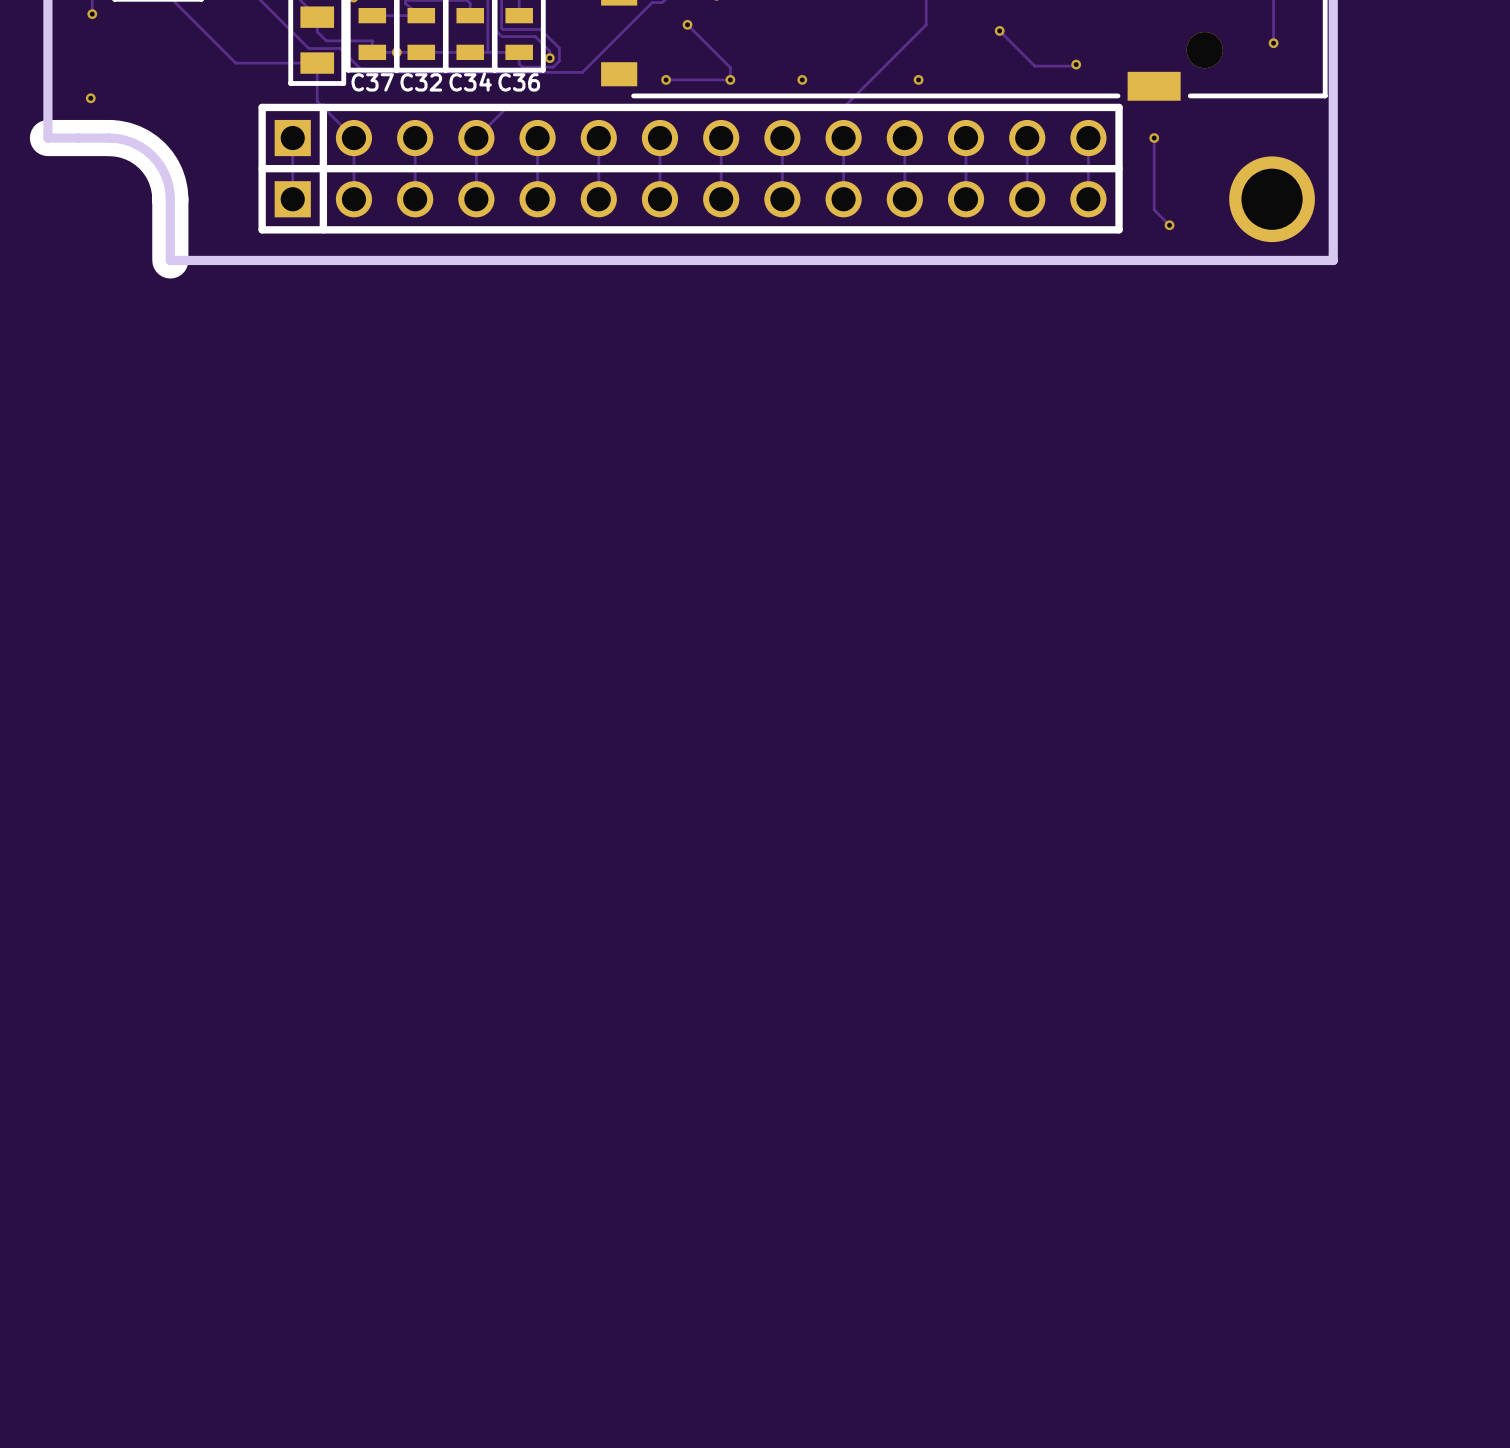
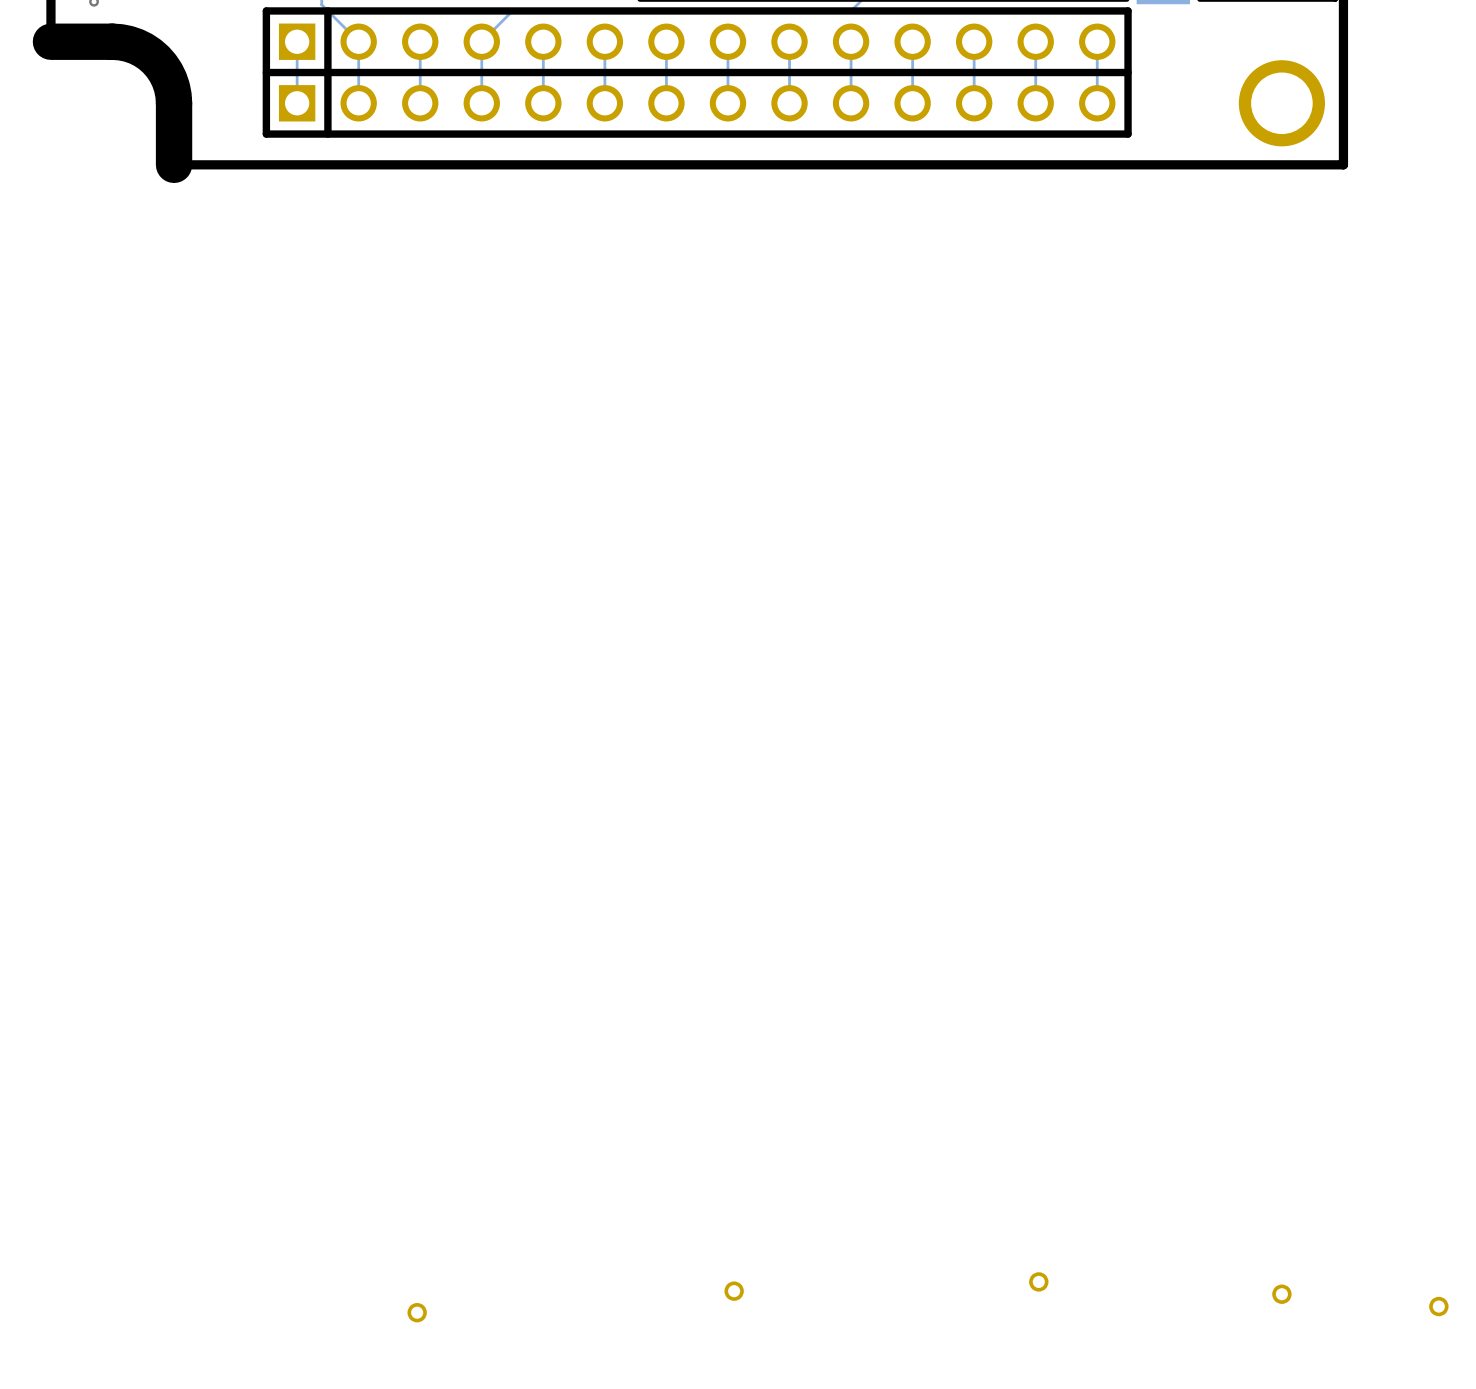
track: (1154, 138) (1154, 209) (1169, 225) -> none
via: (1154, 138) -> none
via: (1169, 225) -> none
part: none -> (1038, 1281)
part: none -> (734, 1291)
part: none -> (1281, 1294)
part: none -> (1438, 1306)
part: none -> (417, 1312)

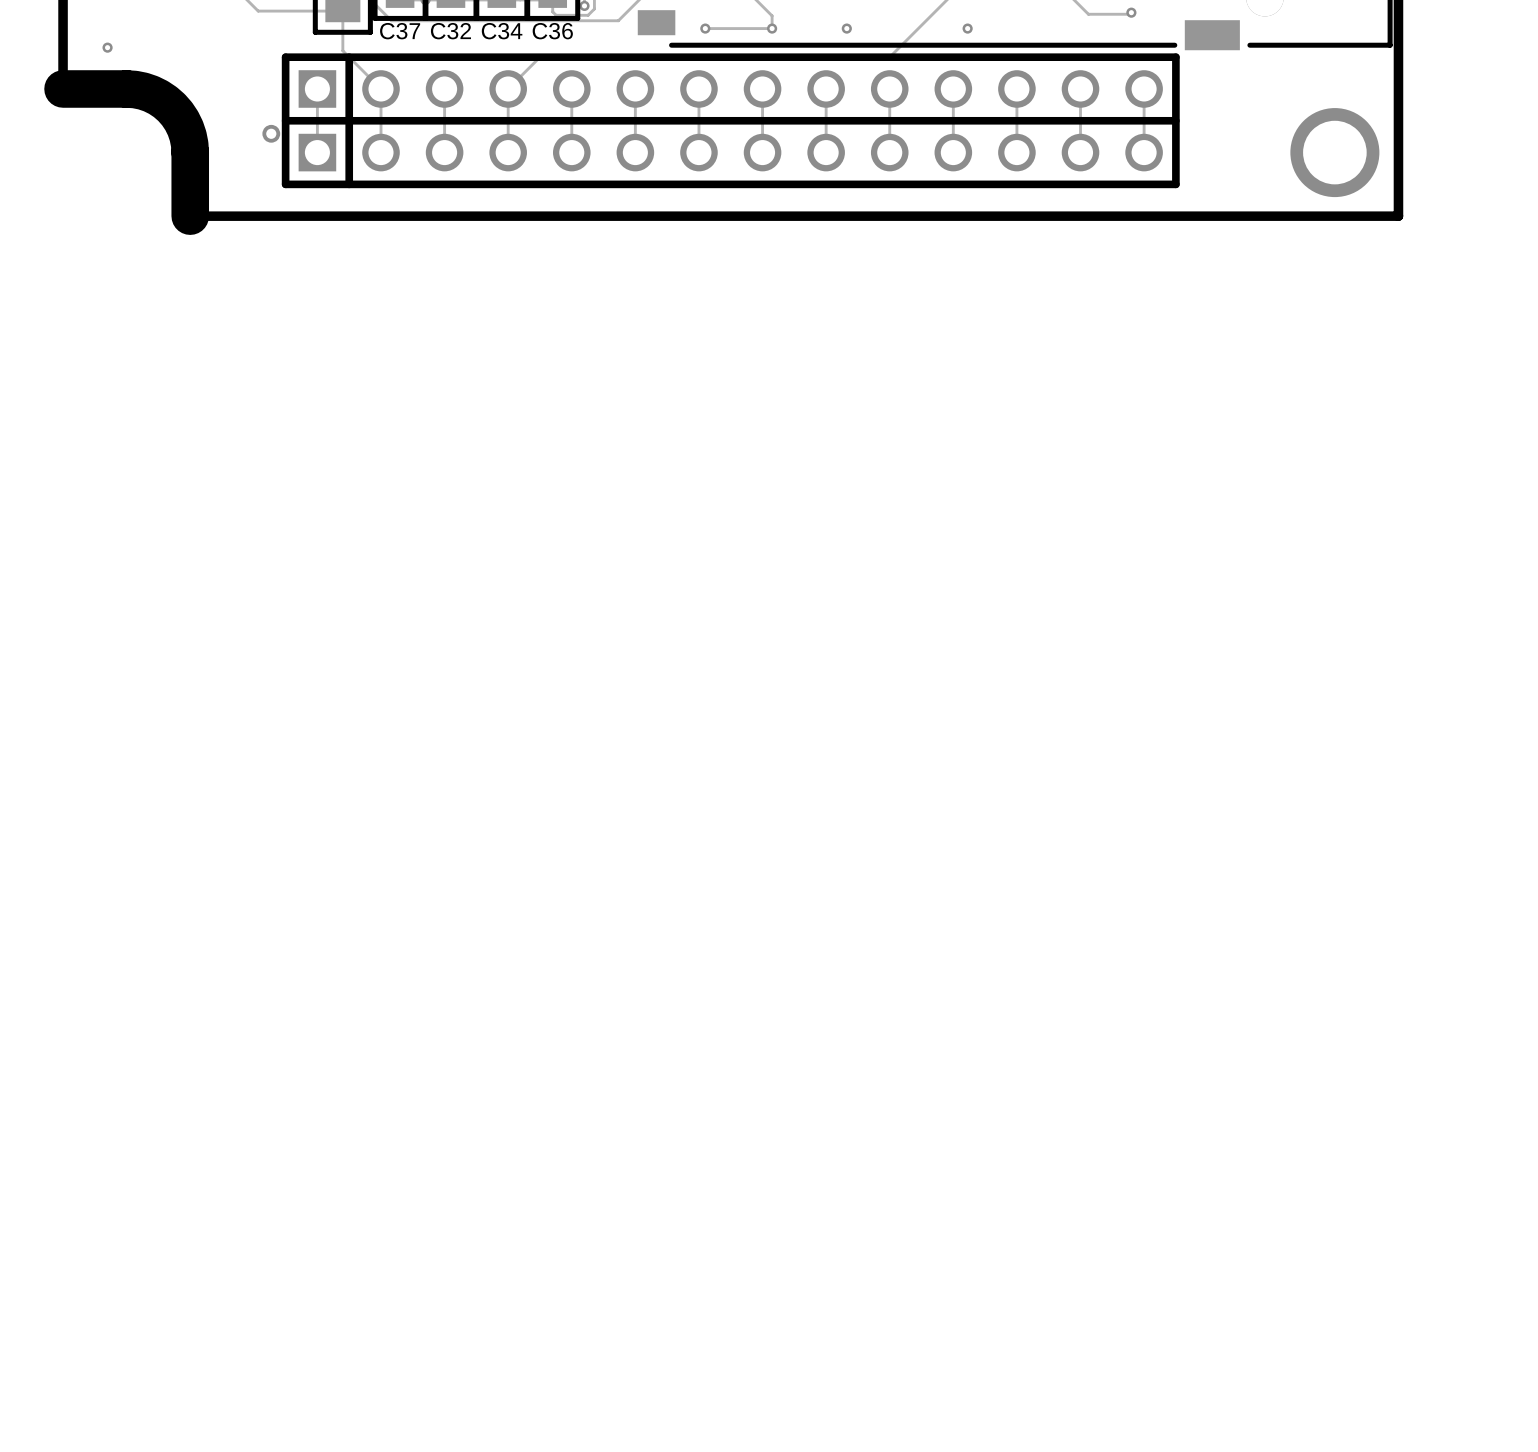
via: none -> (271, 133)
part: (1038, 1281) -> none
part: (734, 1291) -> none
part: (1281, 1294) -> none
part: (1438, 1306) -> none
part: (417, 1312) -> none

